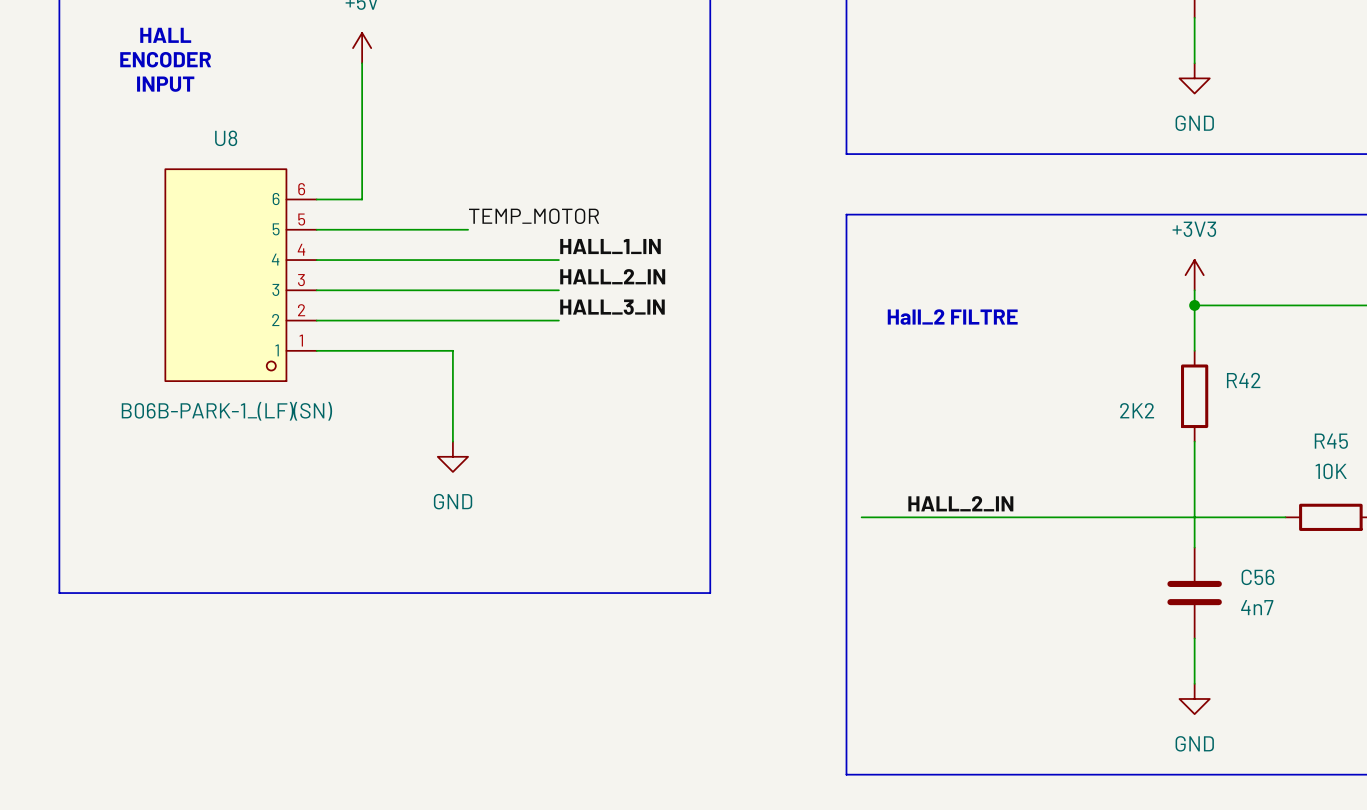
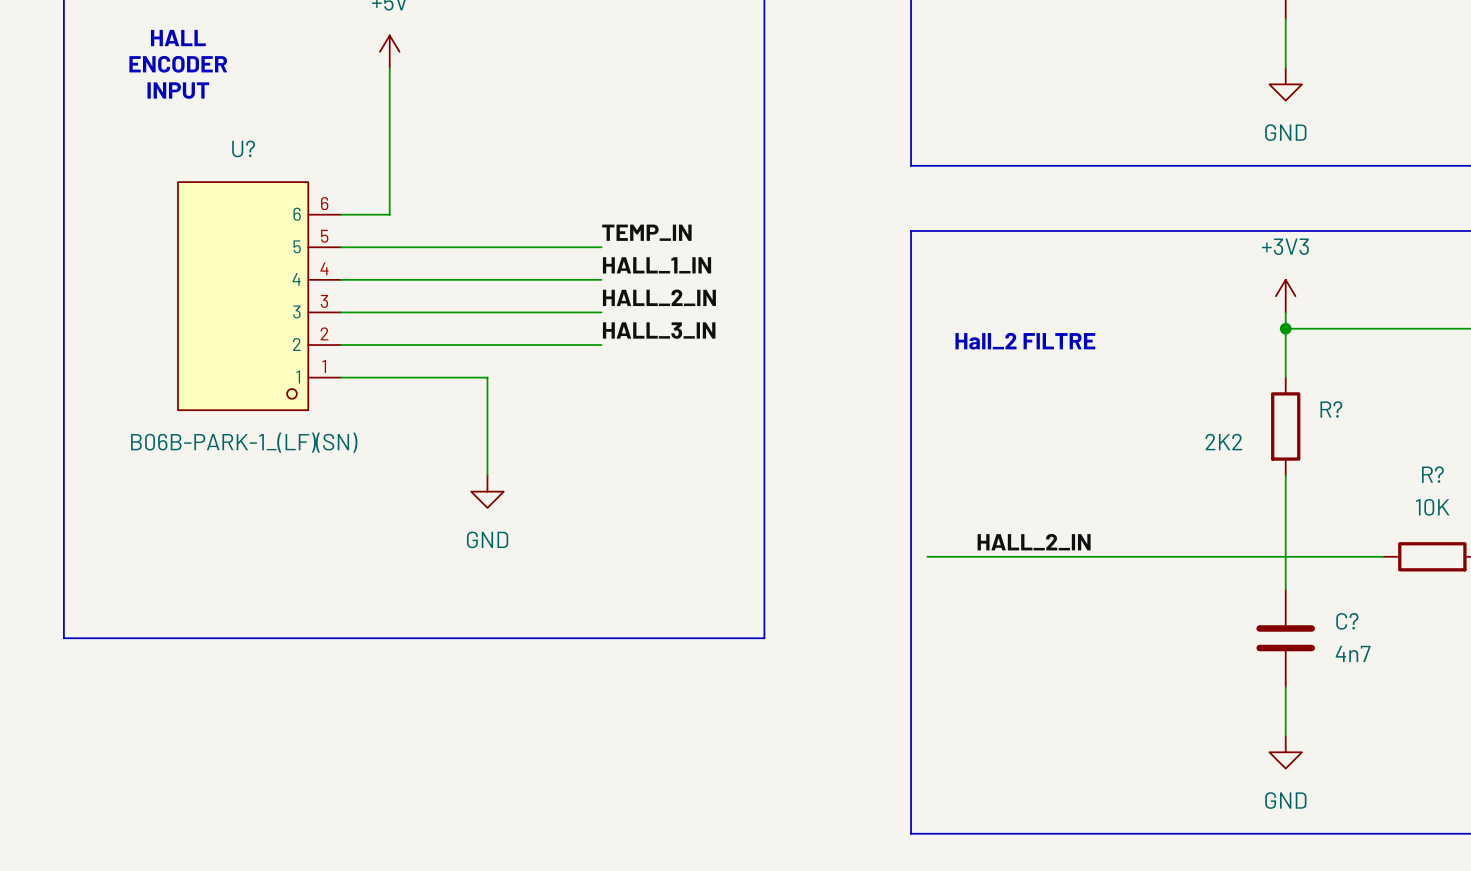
U8 name: U8 (226, 138) -> U? (243, 148)
label: TEMP_MOTOR (534, 216) -> none
label: none -> TEMP_IN (646, 232)
wire: none -> (503, 247) (601, 247)
R42 name: R42 (1243, 380) -> R? (1331, 409)
R45 name: R45 (1331, 441) -> R? (1432, 474)
C56 name: C56 (1257, 577) -> C? (1347, 621)

